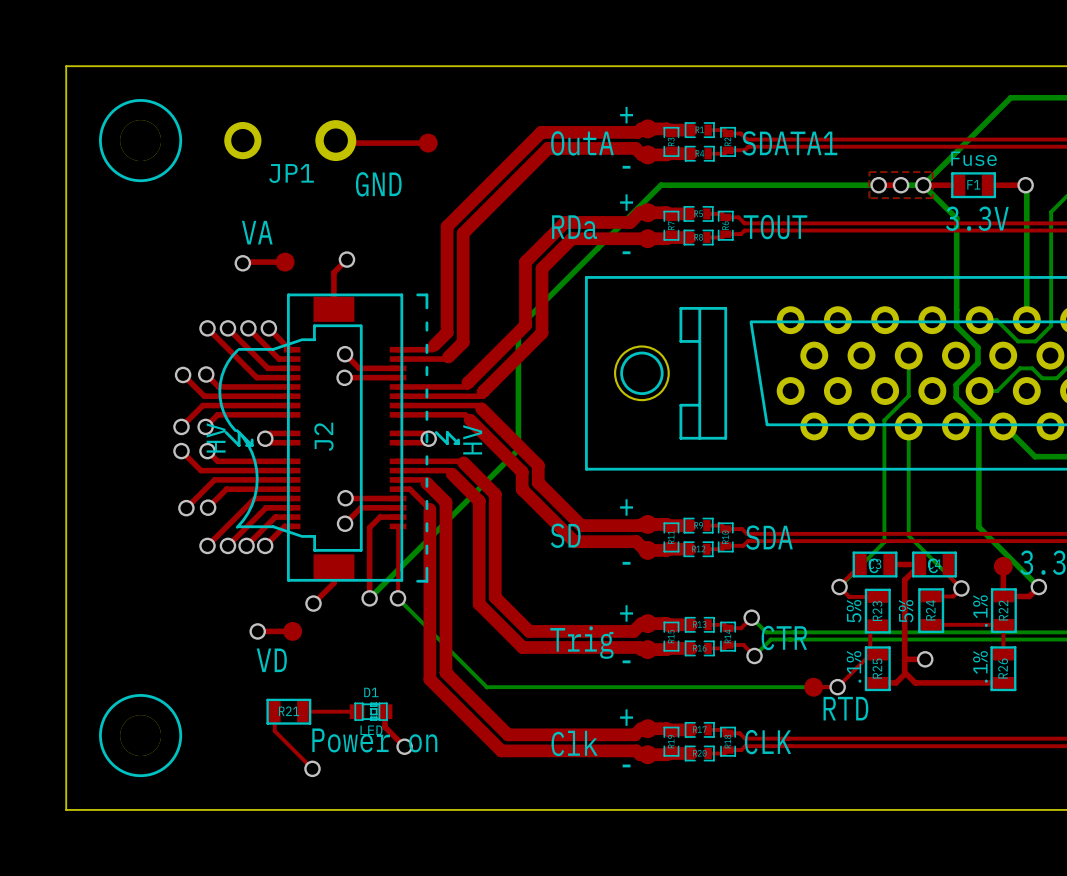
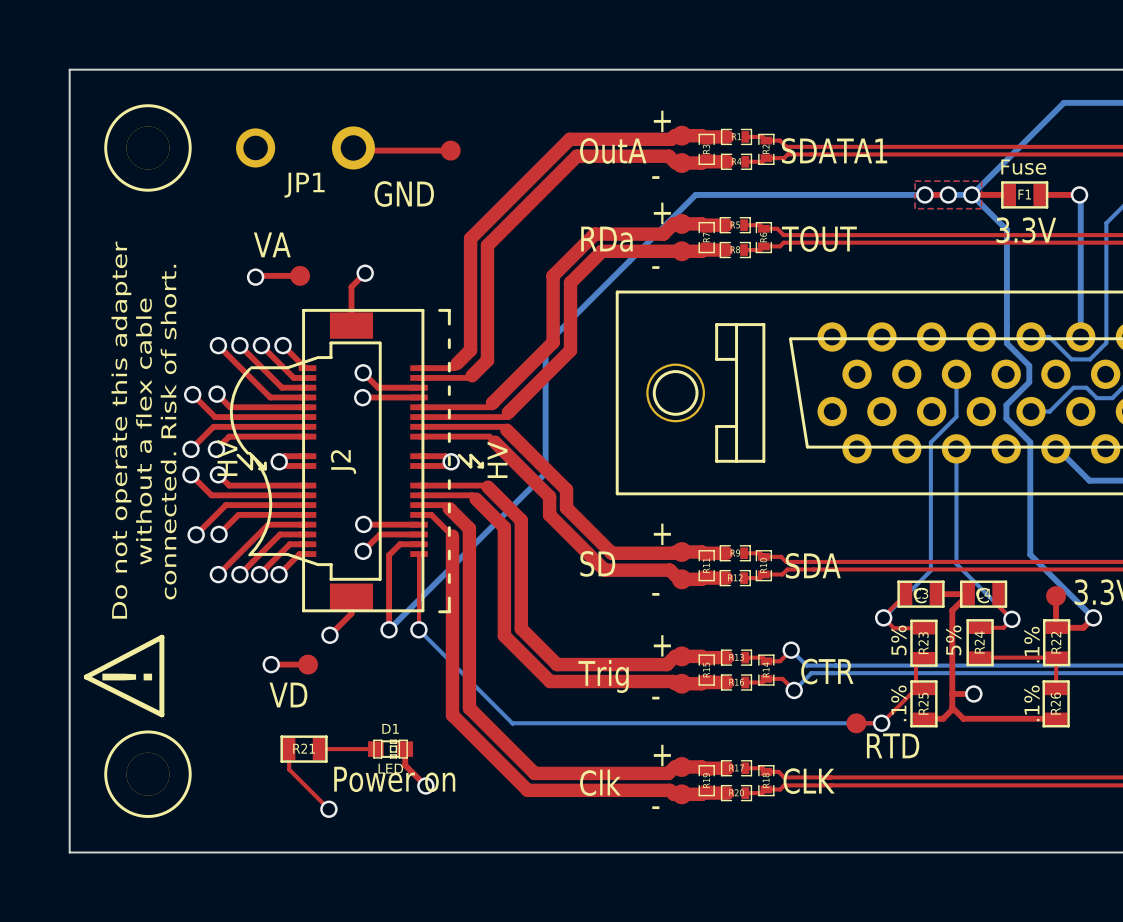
text: none -> Do not operate this adapter (121, 430)
text: none -> without a flex cable (144, 431)
text: none -> connected. Risk of short. (168, 432)
line: none -> (161, 637) (161, 714) (86, 677) (161, 637)
text: none -> ! (127, 677)

